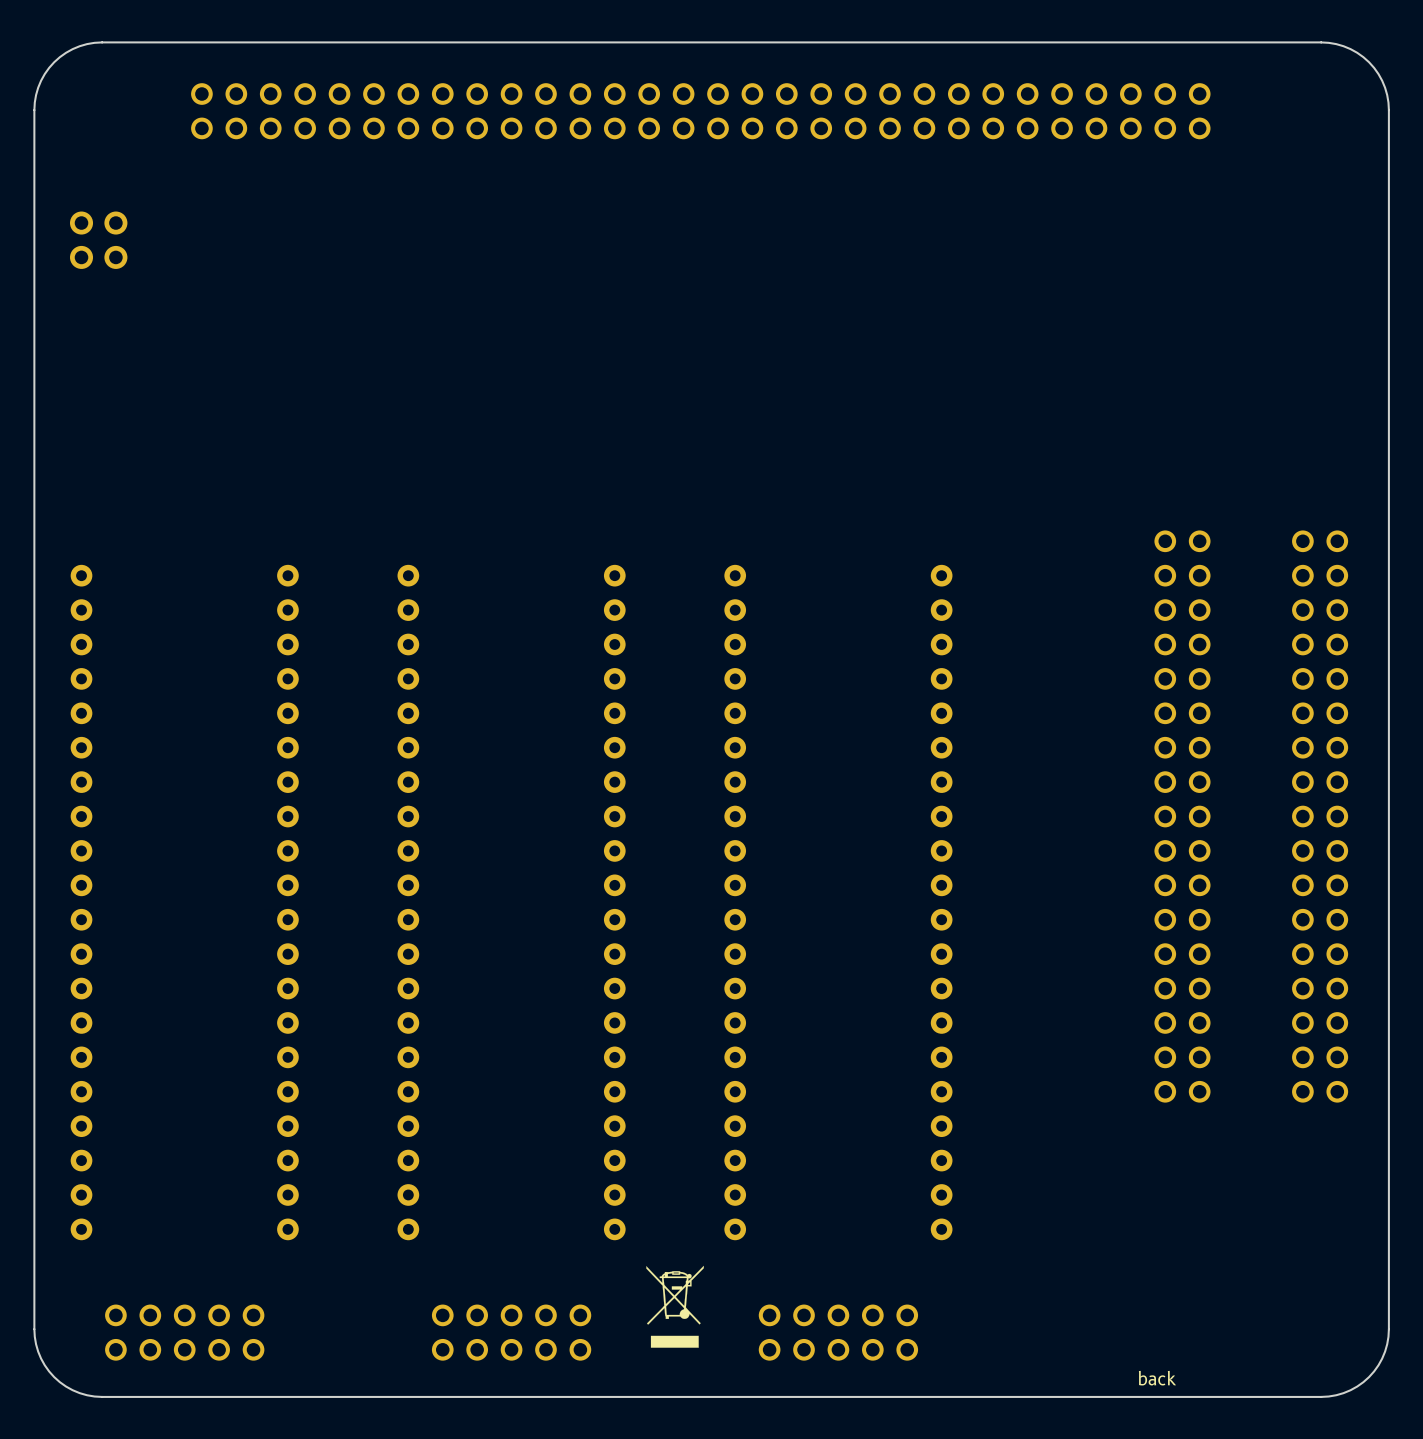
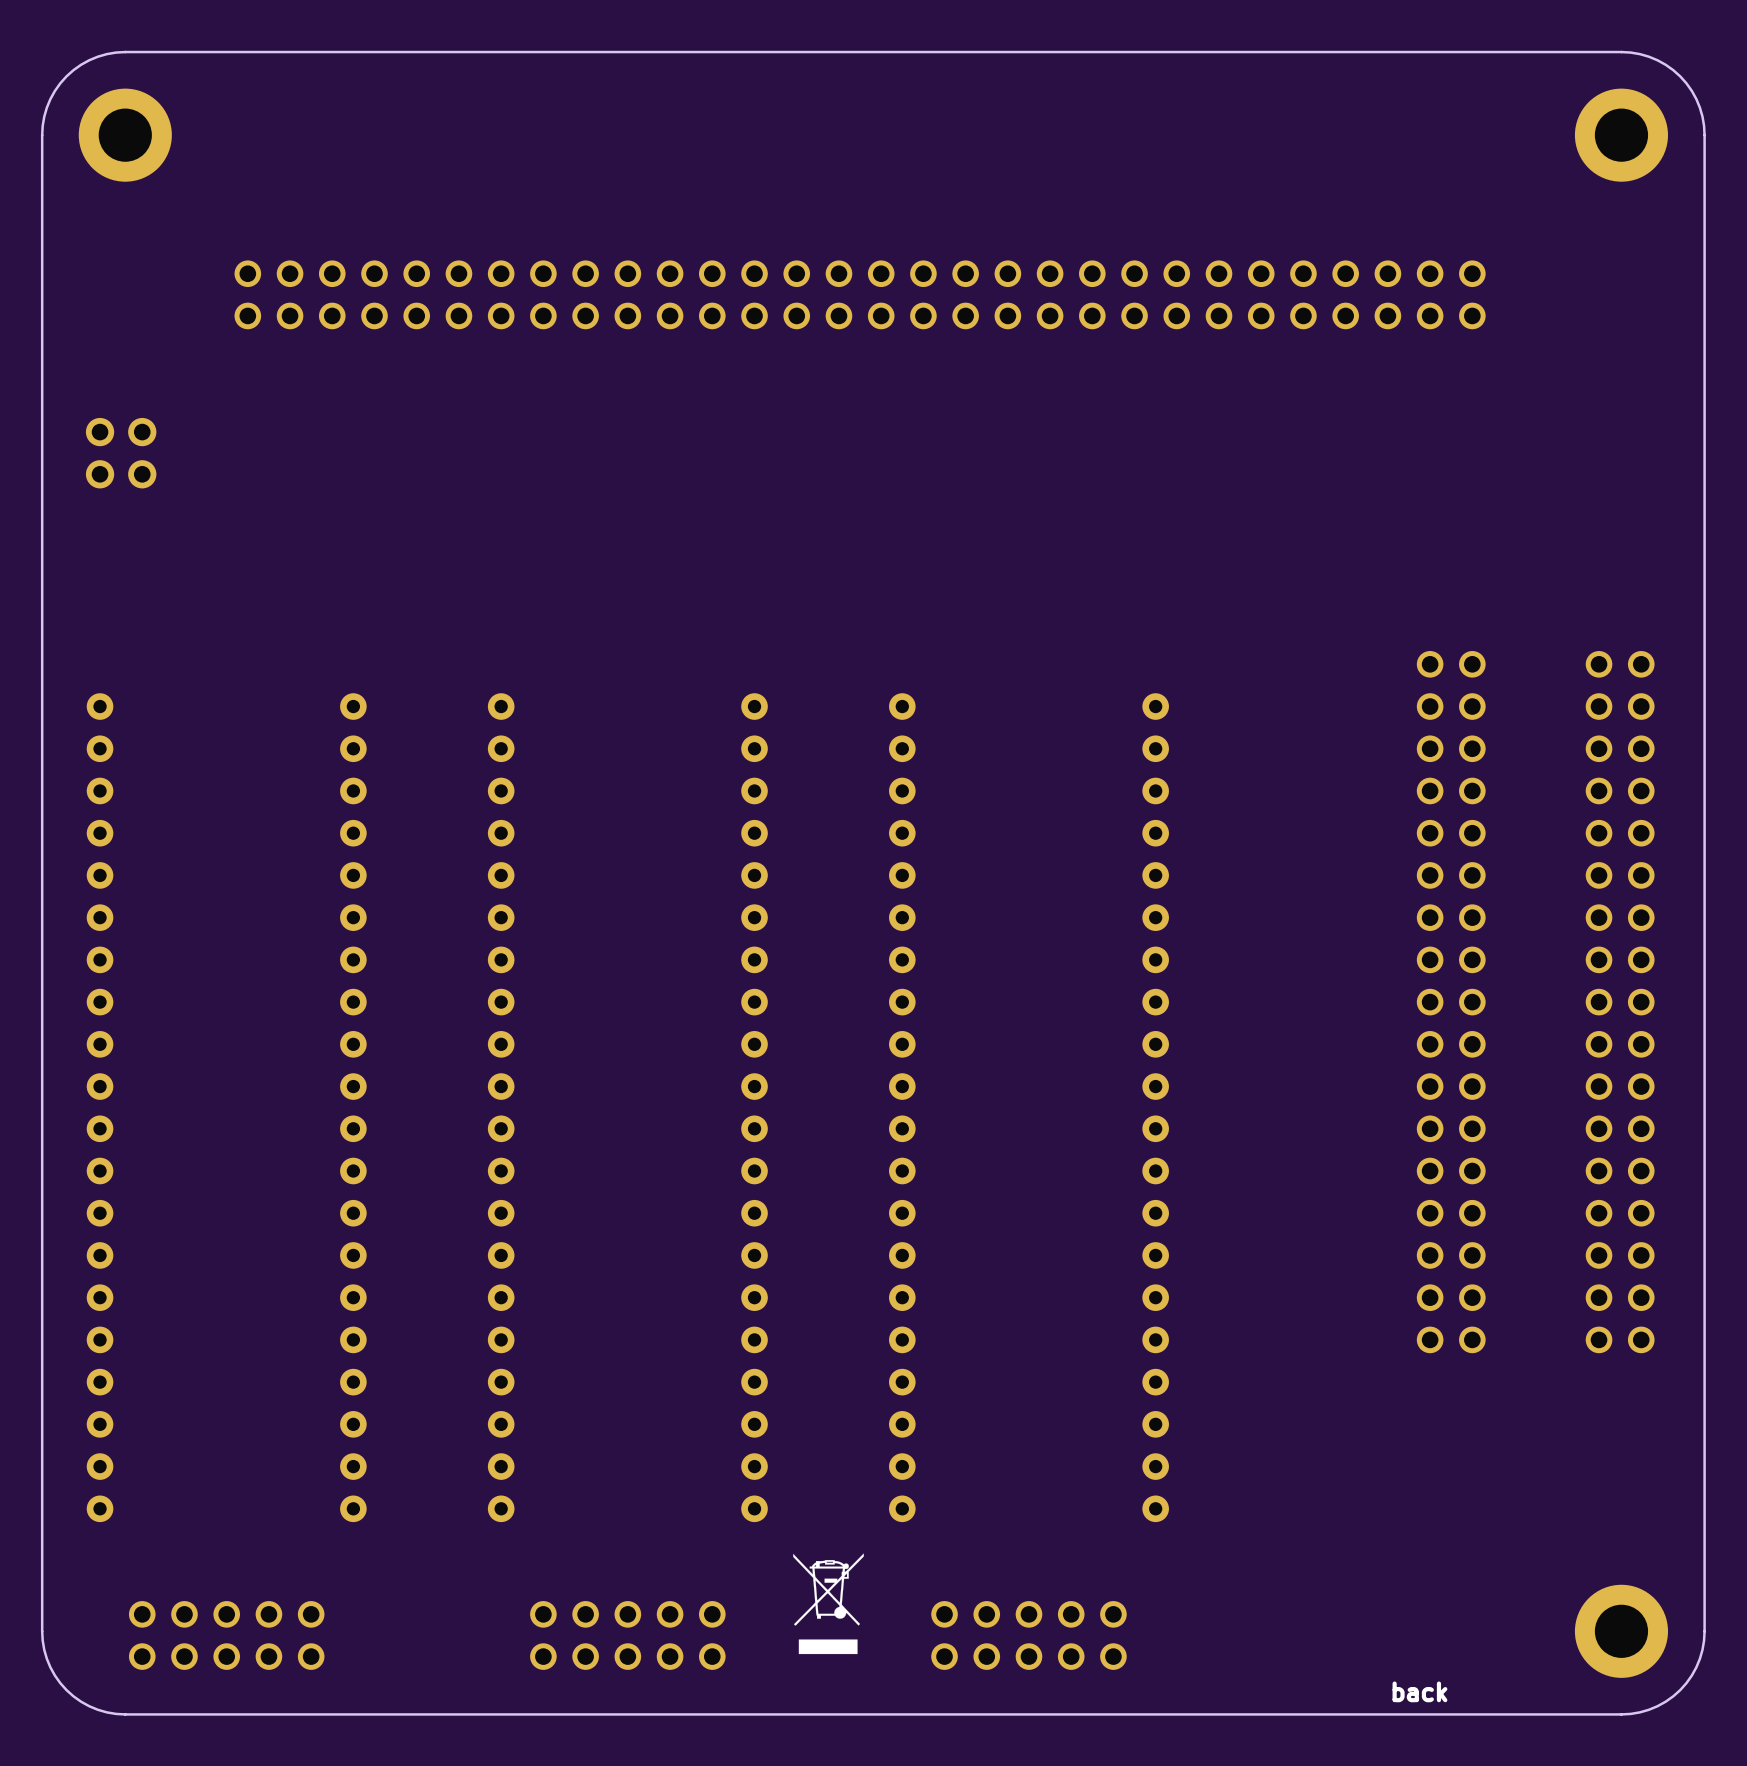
part: none -> (125, 135)
part: none -> (1621, 135)
part position: (700, 111) -> (860, 294)
part position: (98, 240) -> (121, 453)
part: none -> (1621, 1631)

